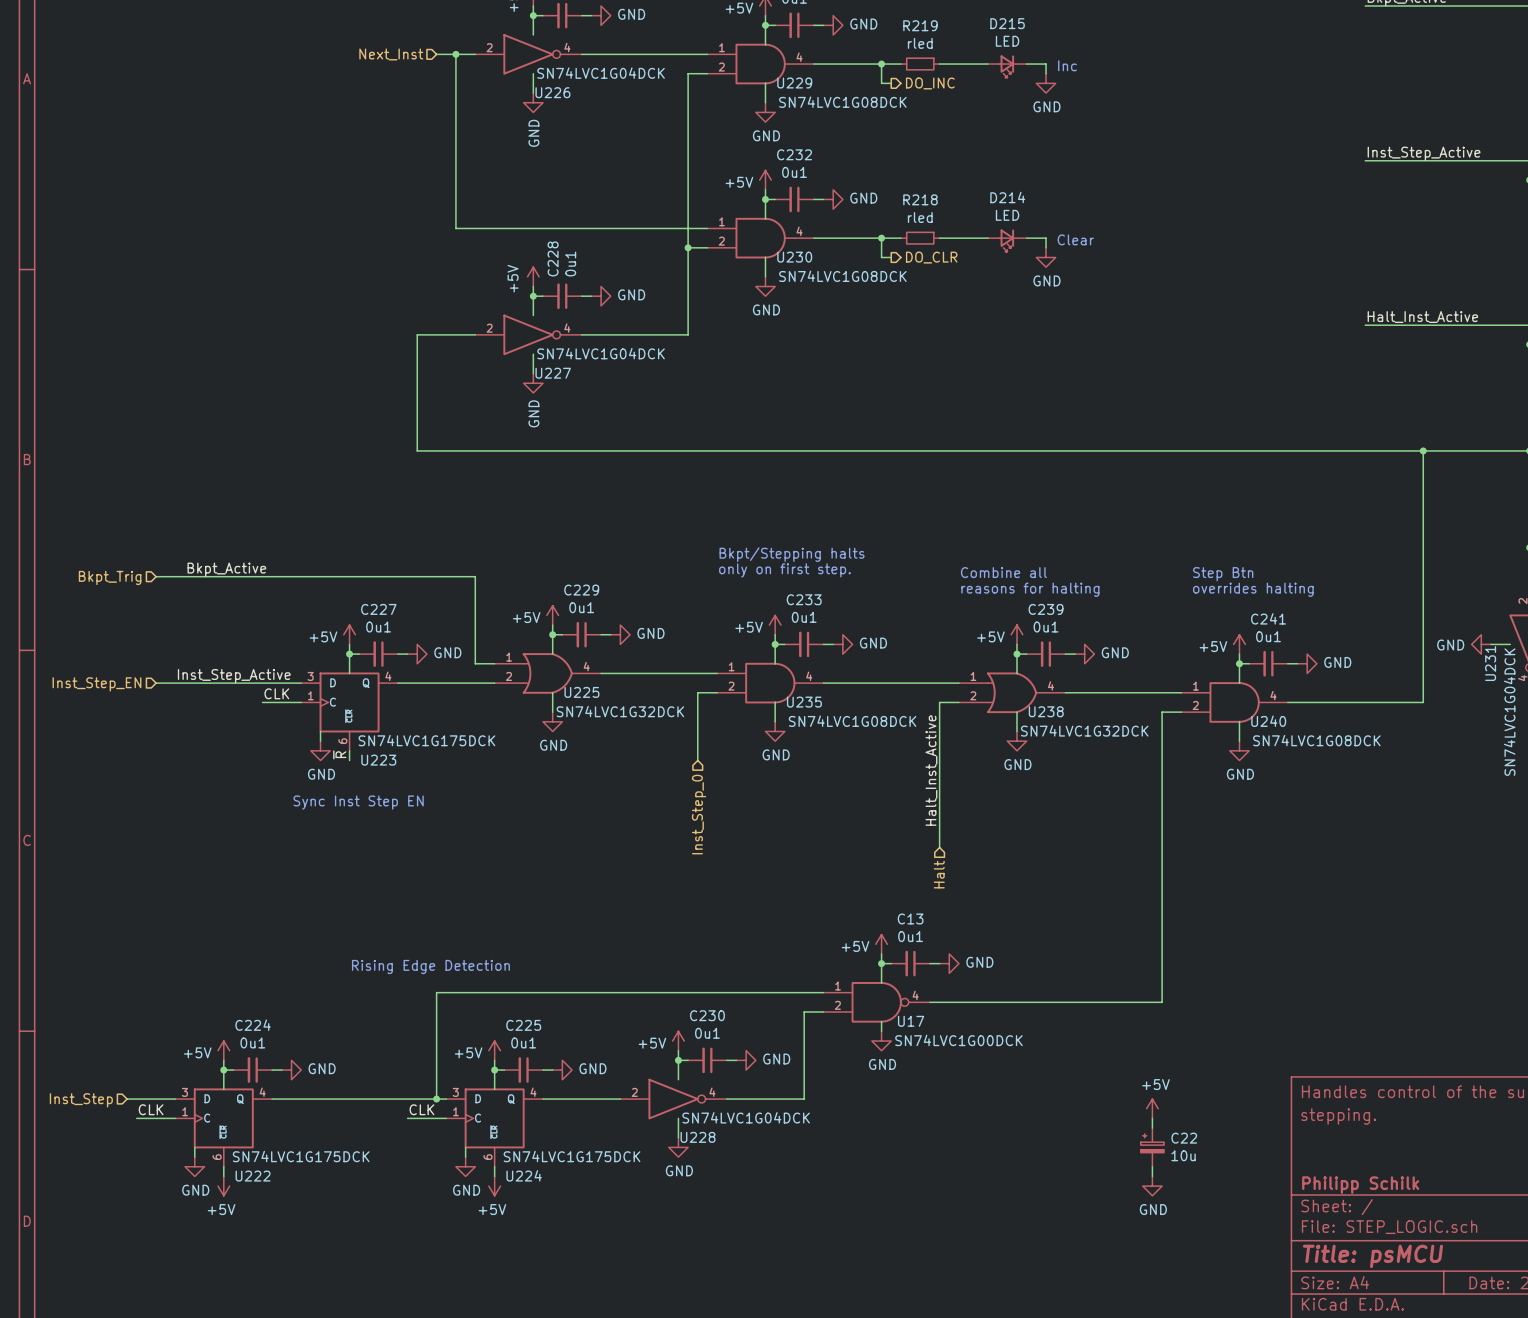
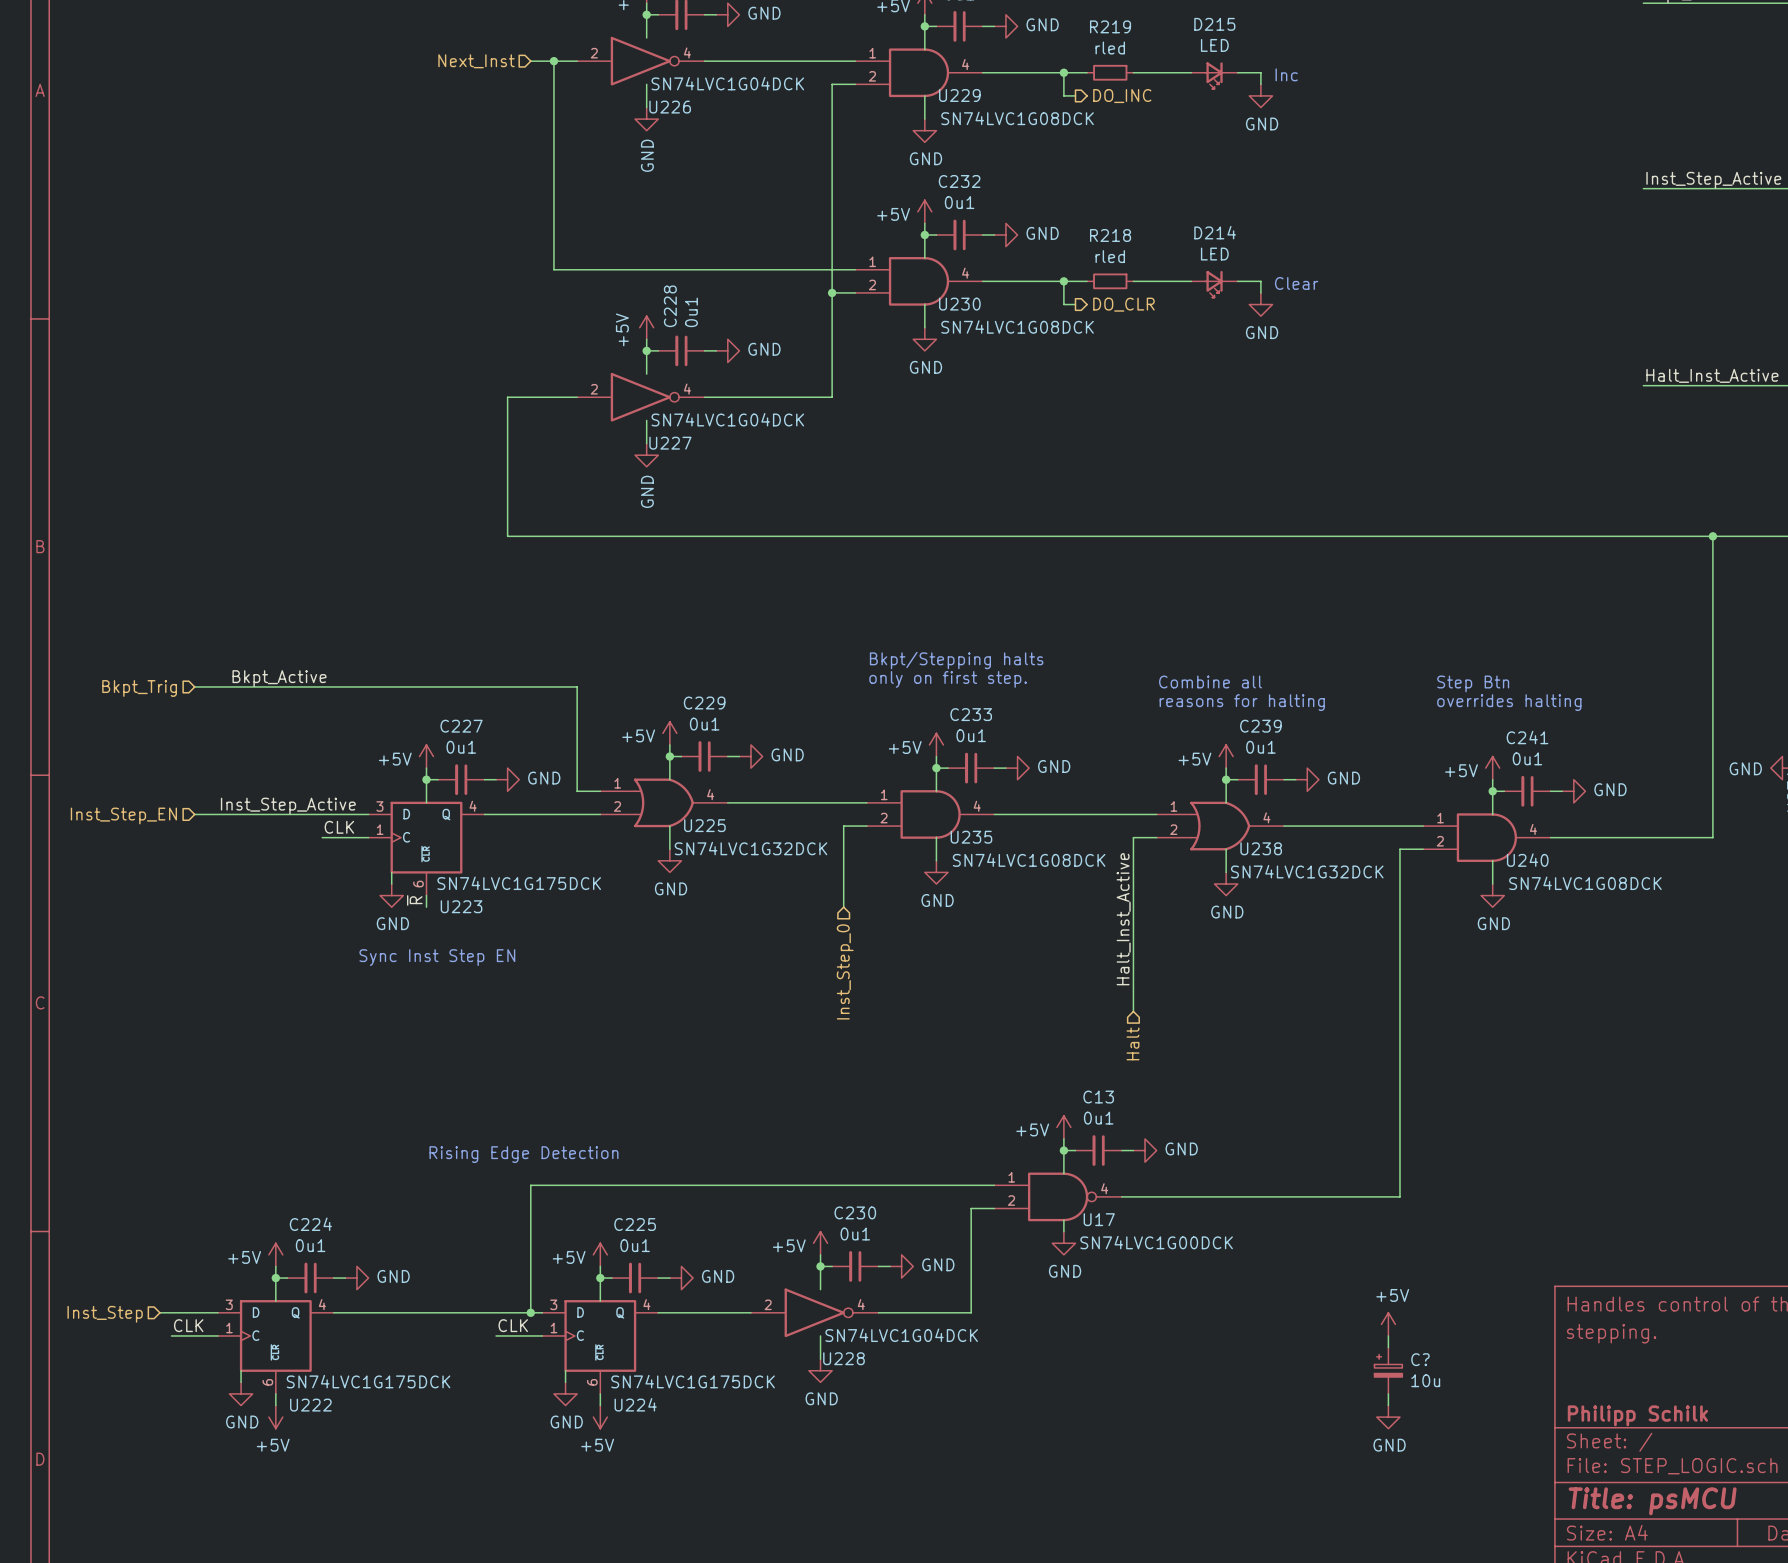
C22 name: C22 (1184, 1138) -> C? (1420, 1359)

